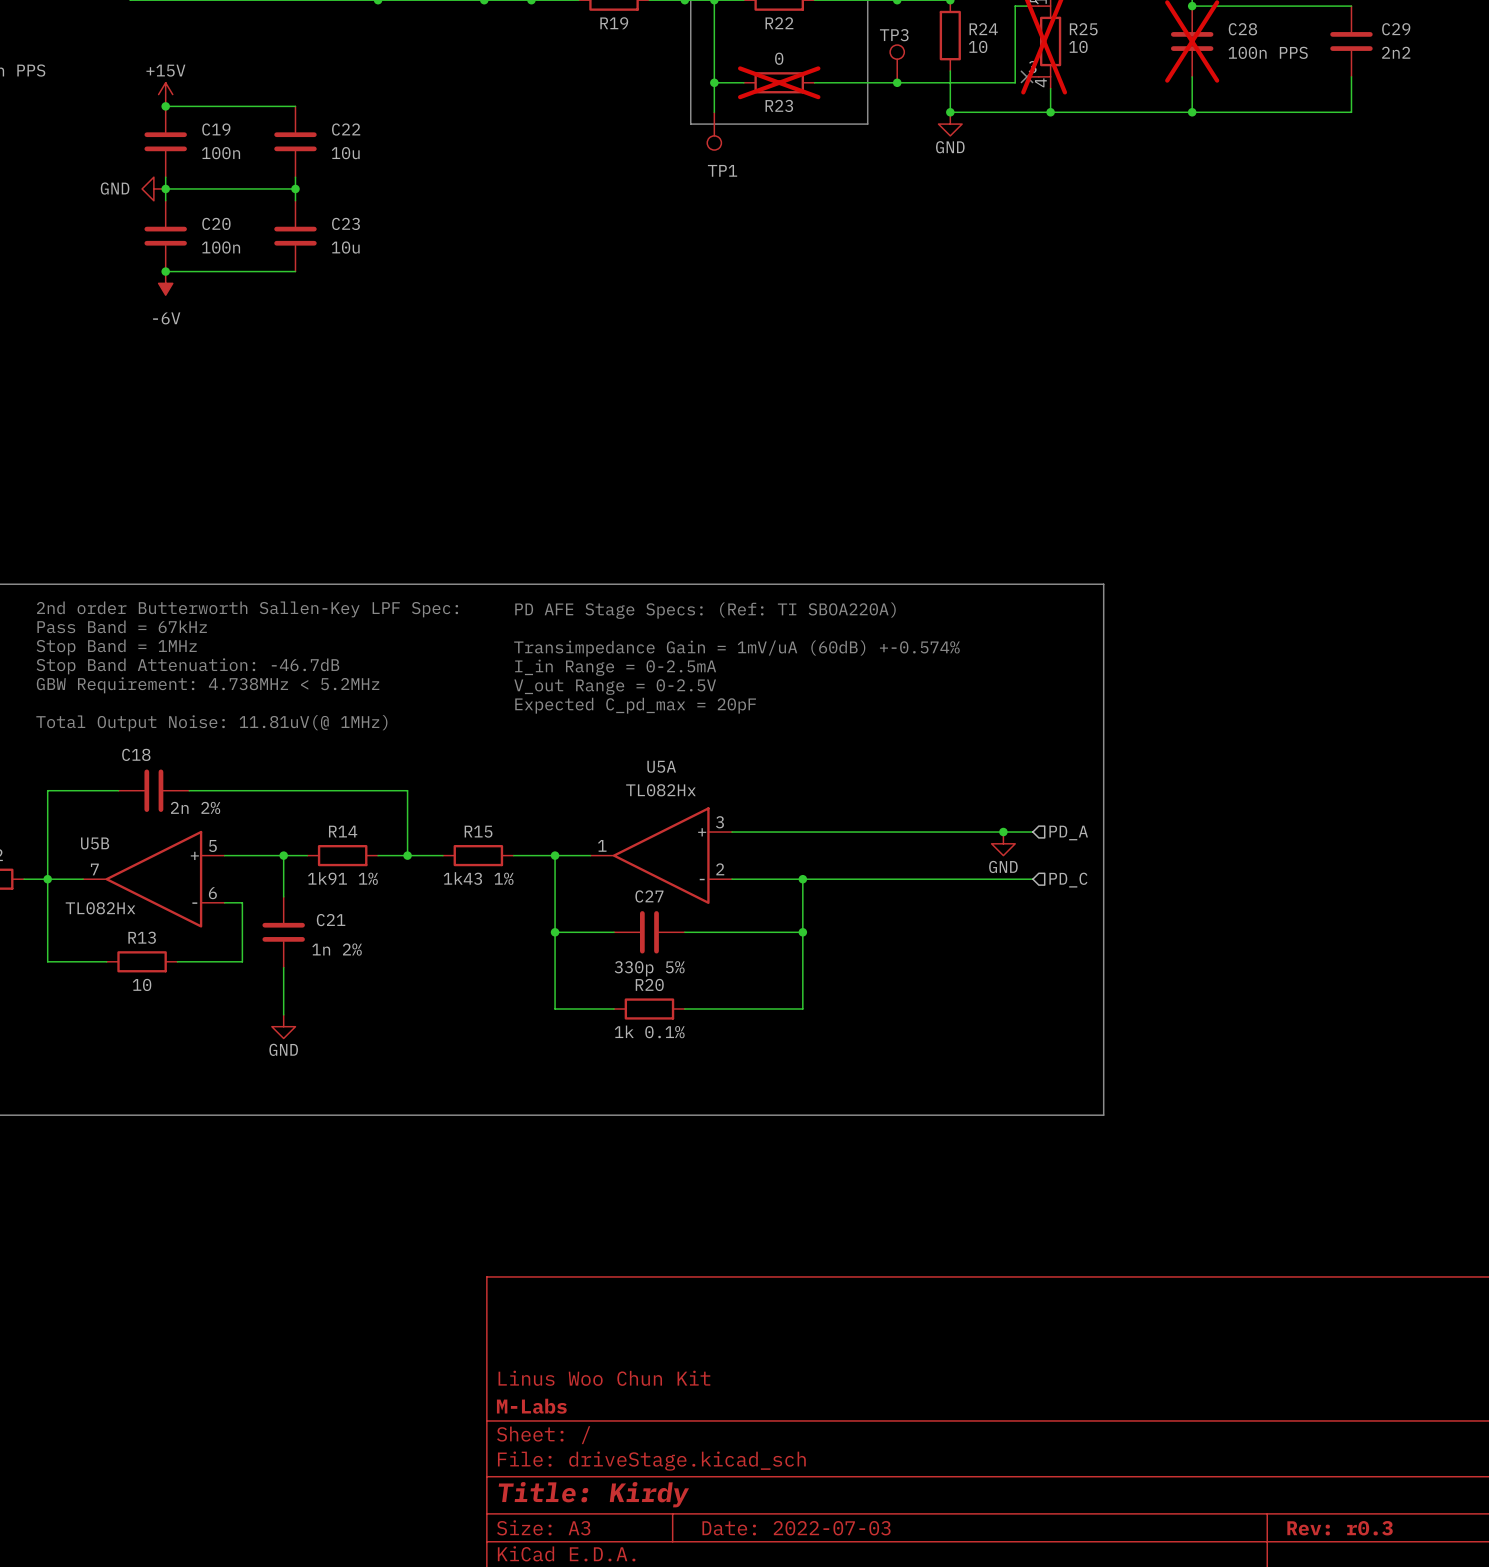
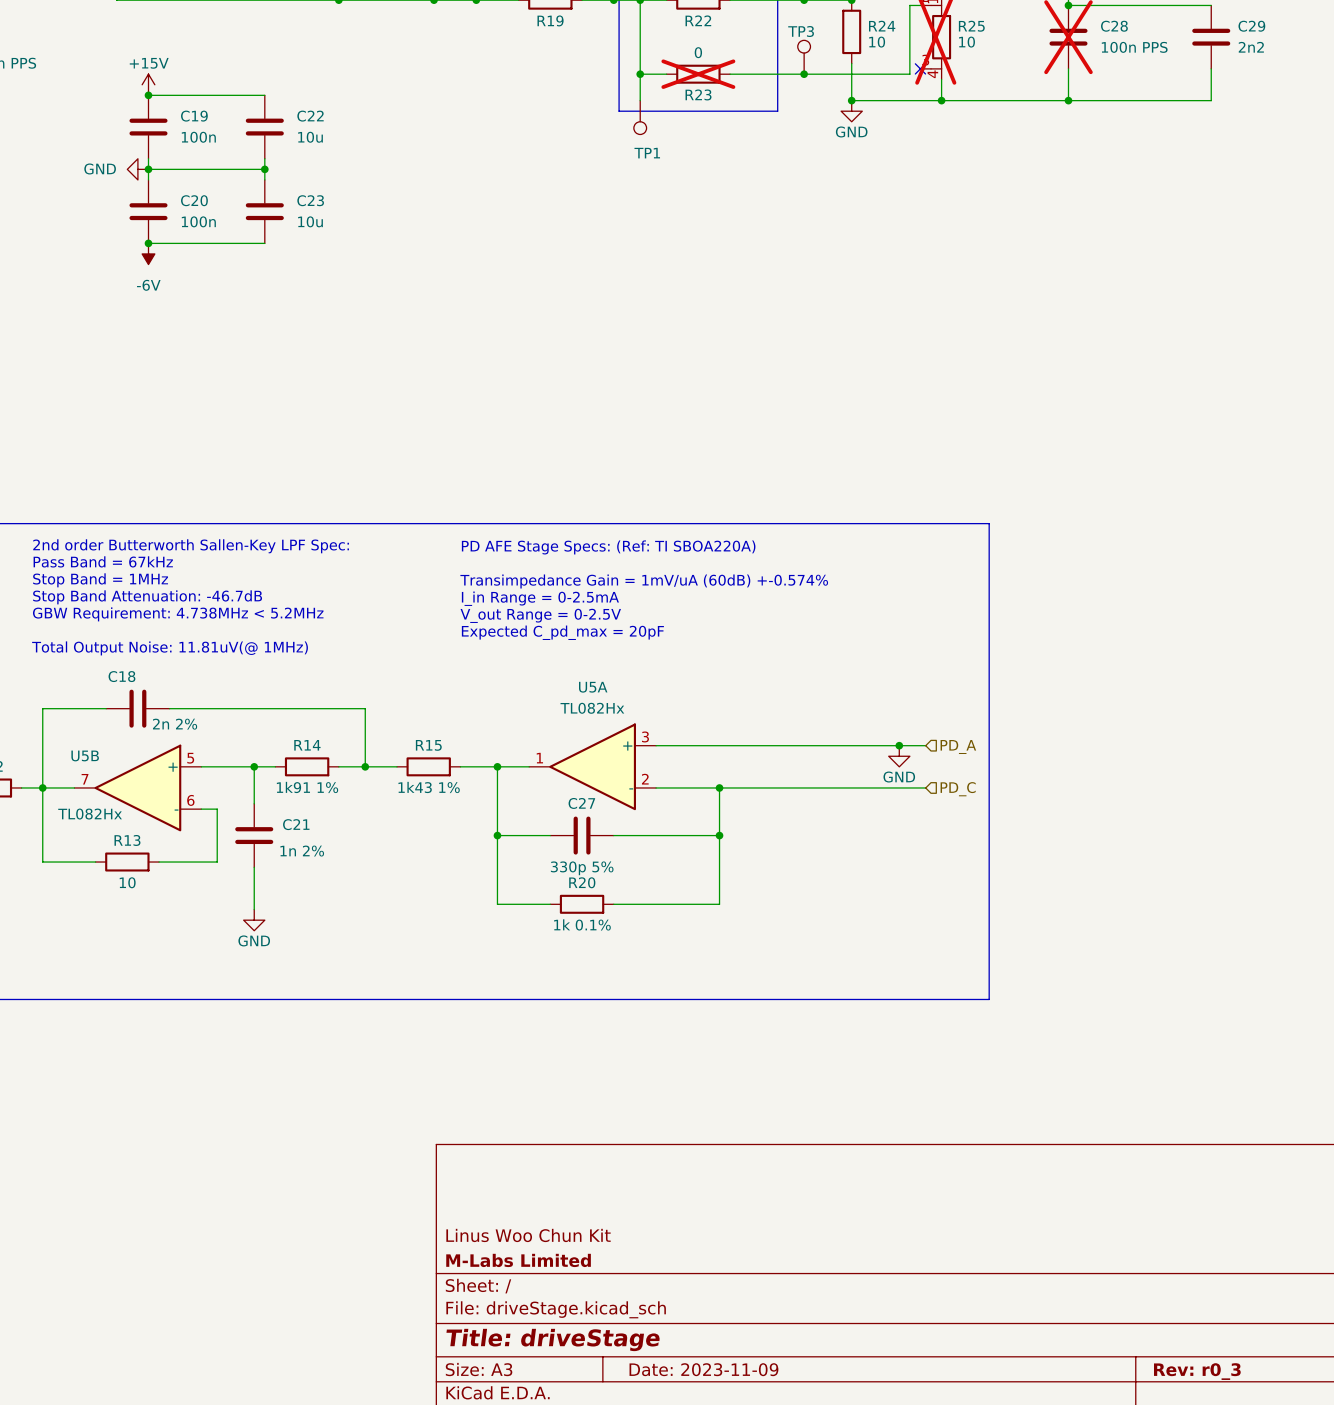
title block: M-Labs (531, 1406) -> M-Labs Limited (518, 1260)
title block: Title: Kirdy (593, 1494) -> Title: driveStage (553, 1339)
title block: Date: 2022-07-03 (796, 1528) -> Date: 2023-11-09 (703, 1369)
title block: Rev: r0.3 (1340, 1528) -> Rev: r0_3 (1197, 1371)

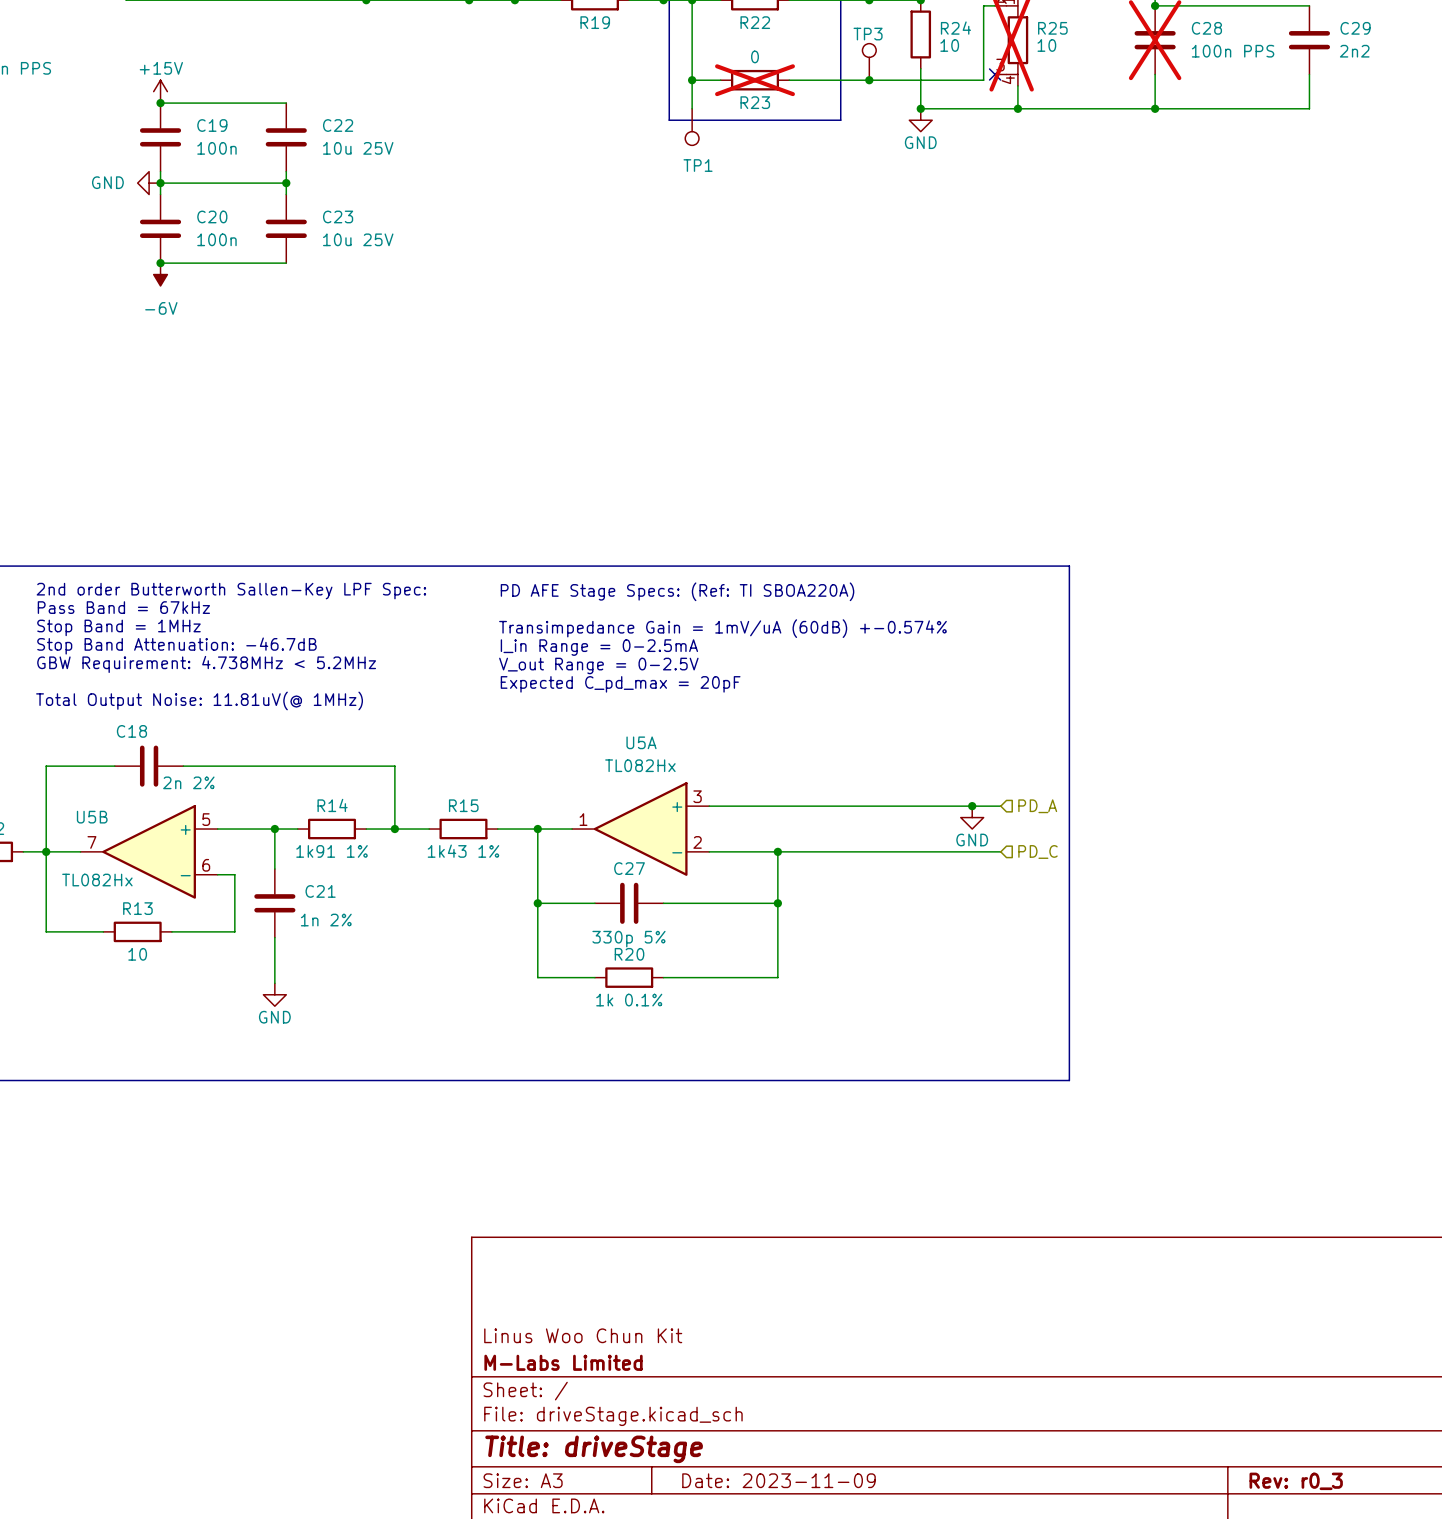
C22 value: 10u (310, 137) -> 10u 25V (358, 148)
C23 value: 10u (310, 221) -> 10u 25V (358, 239)

